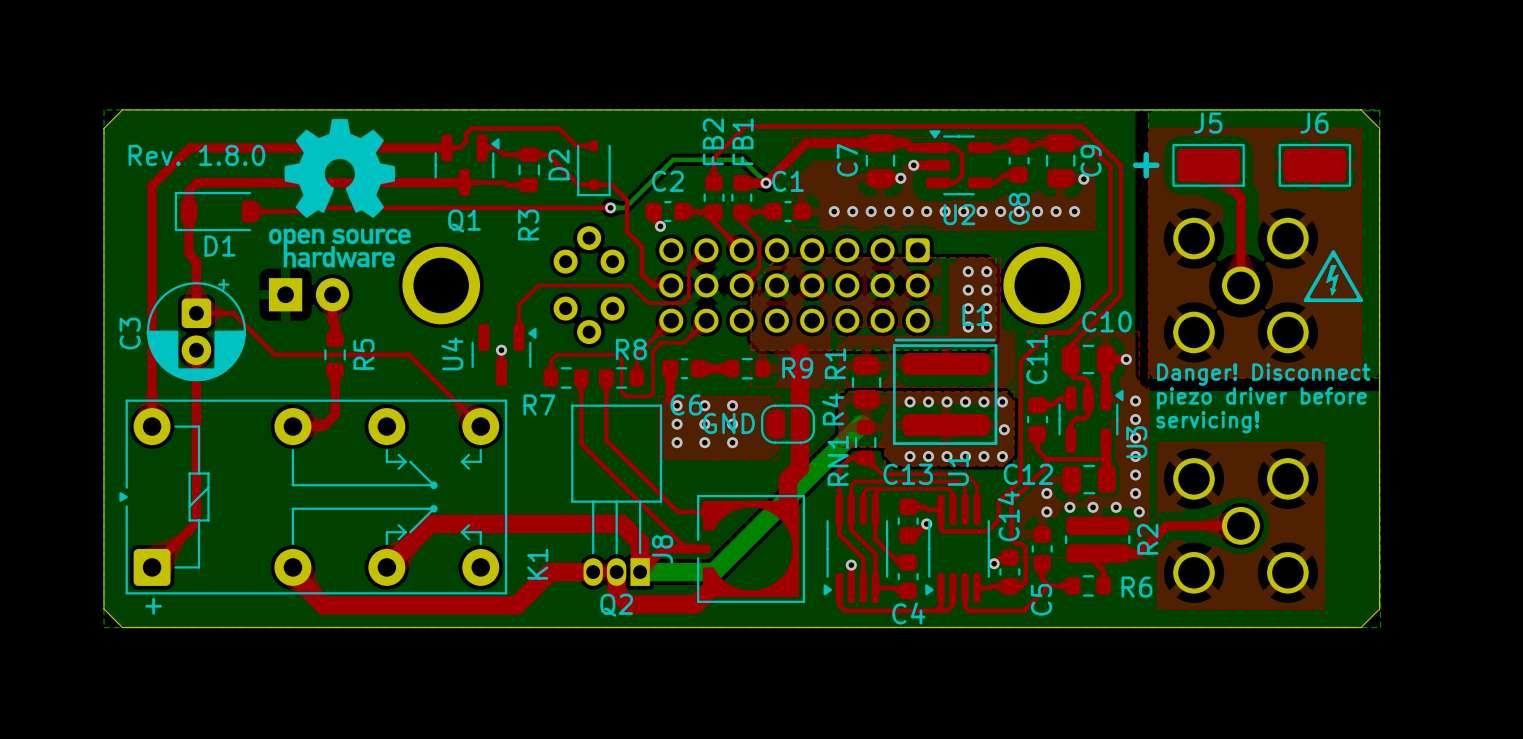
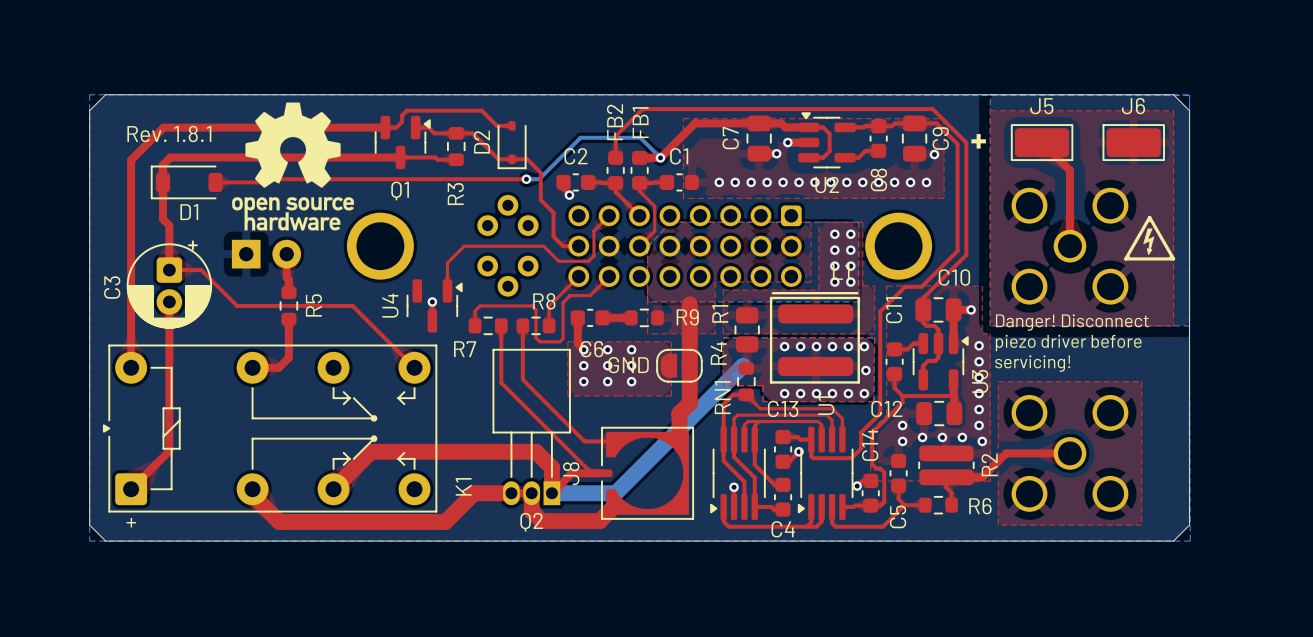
text: Rev. 1.8.0 (196, 155) -> Rev. 1.8.1 (169, 133)

